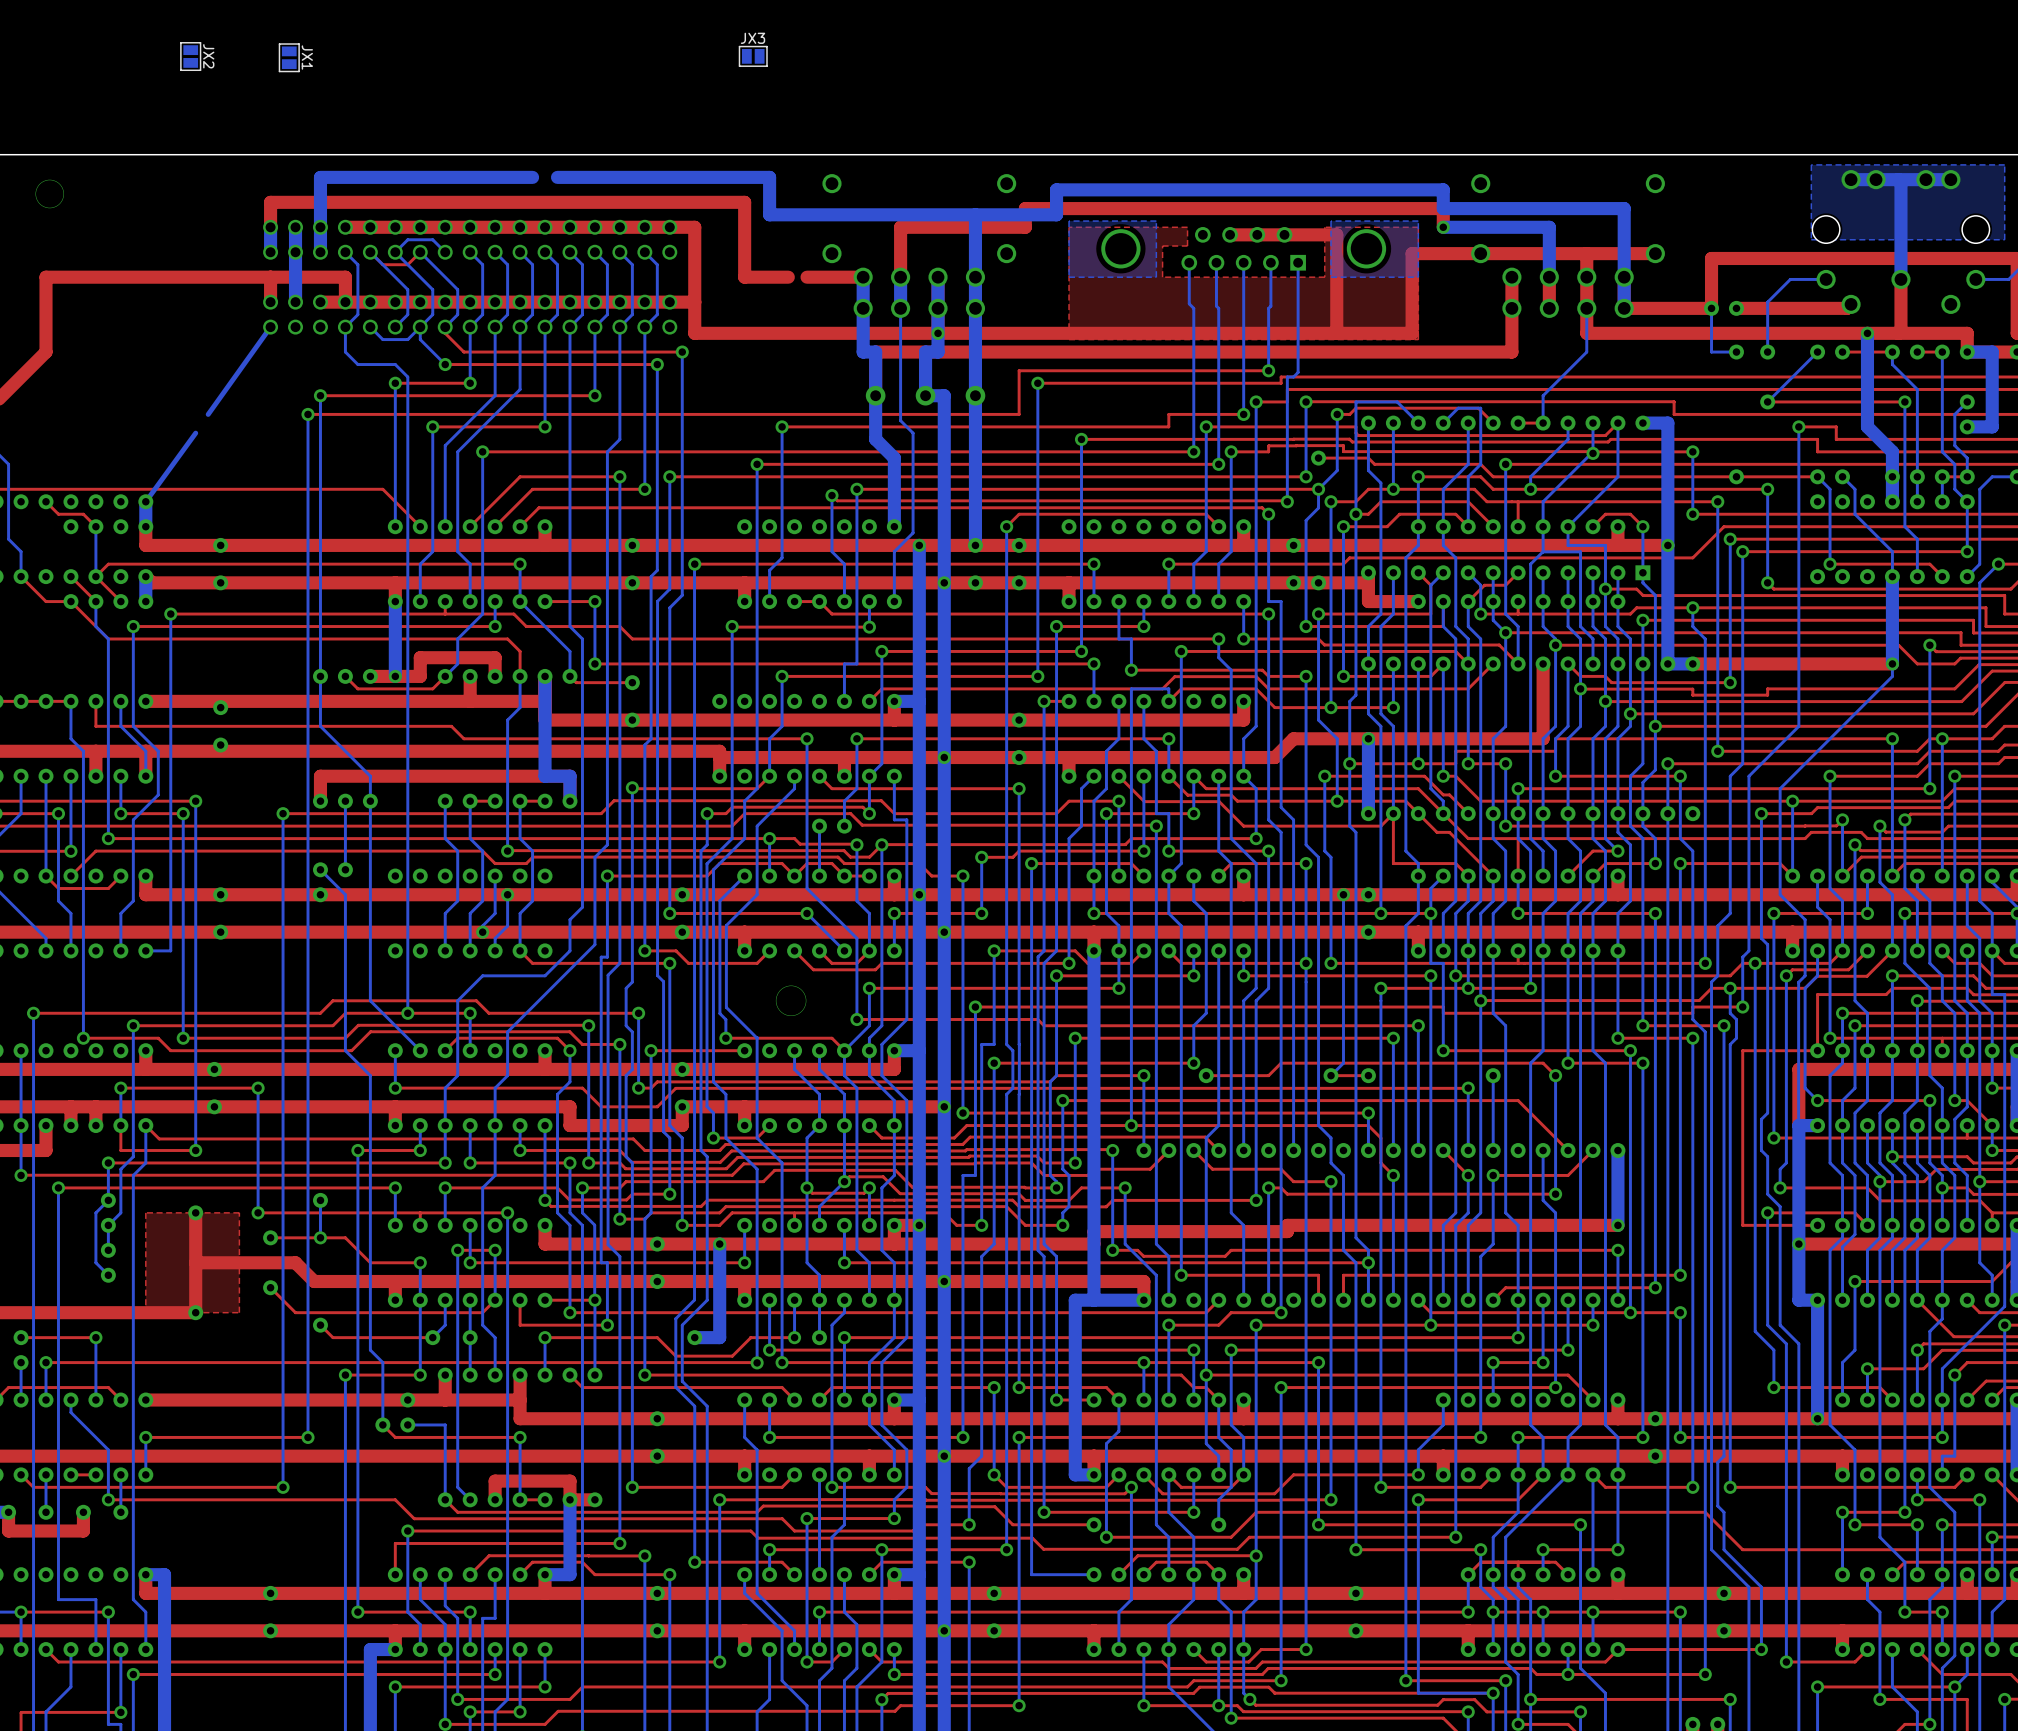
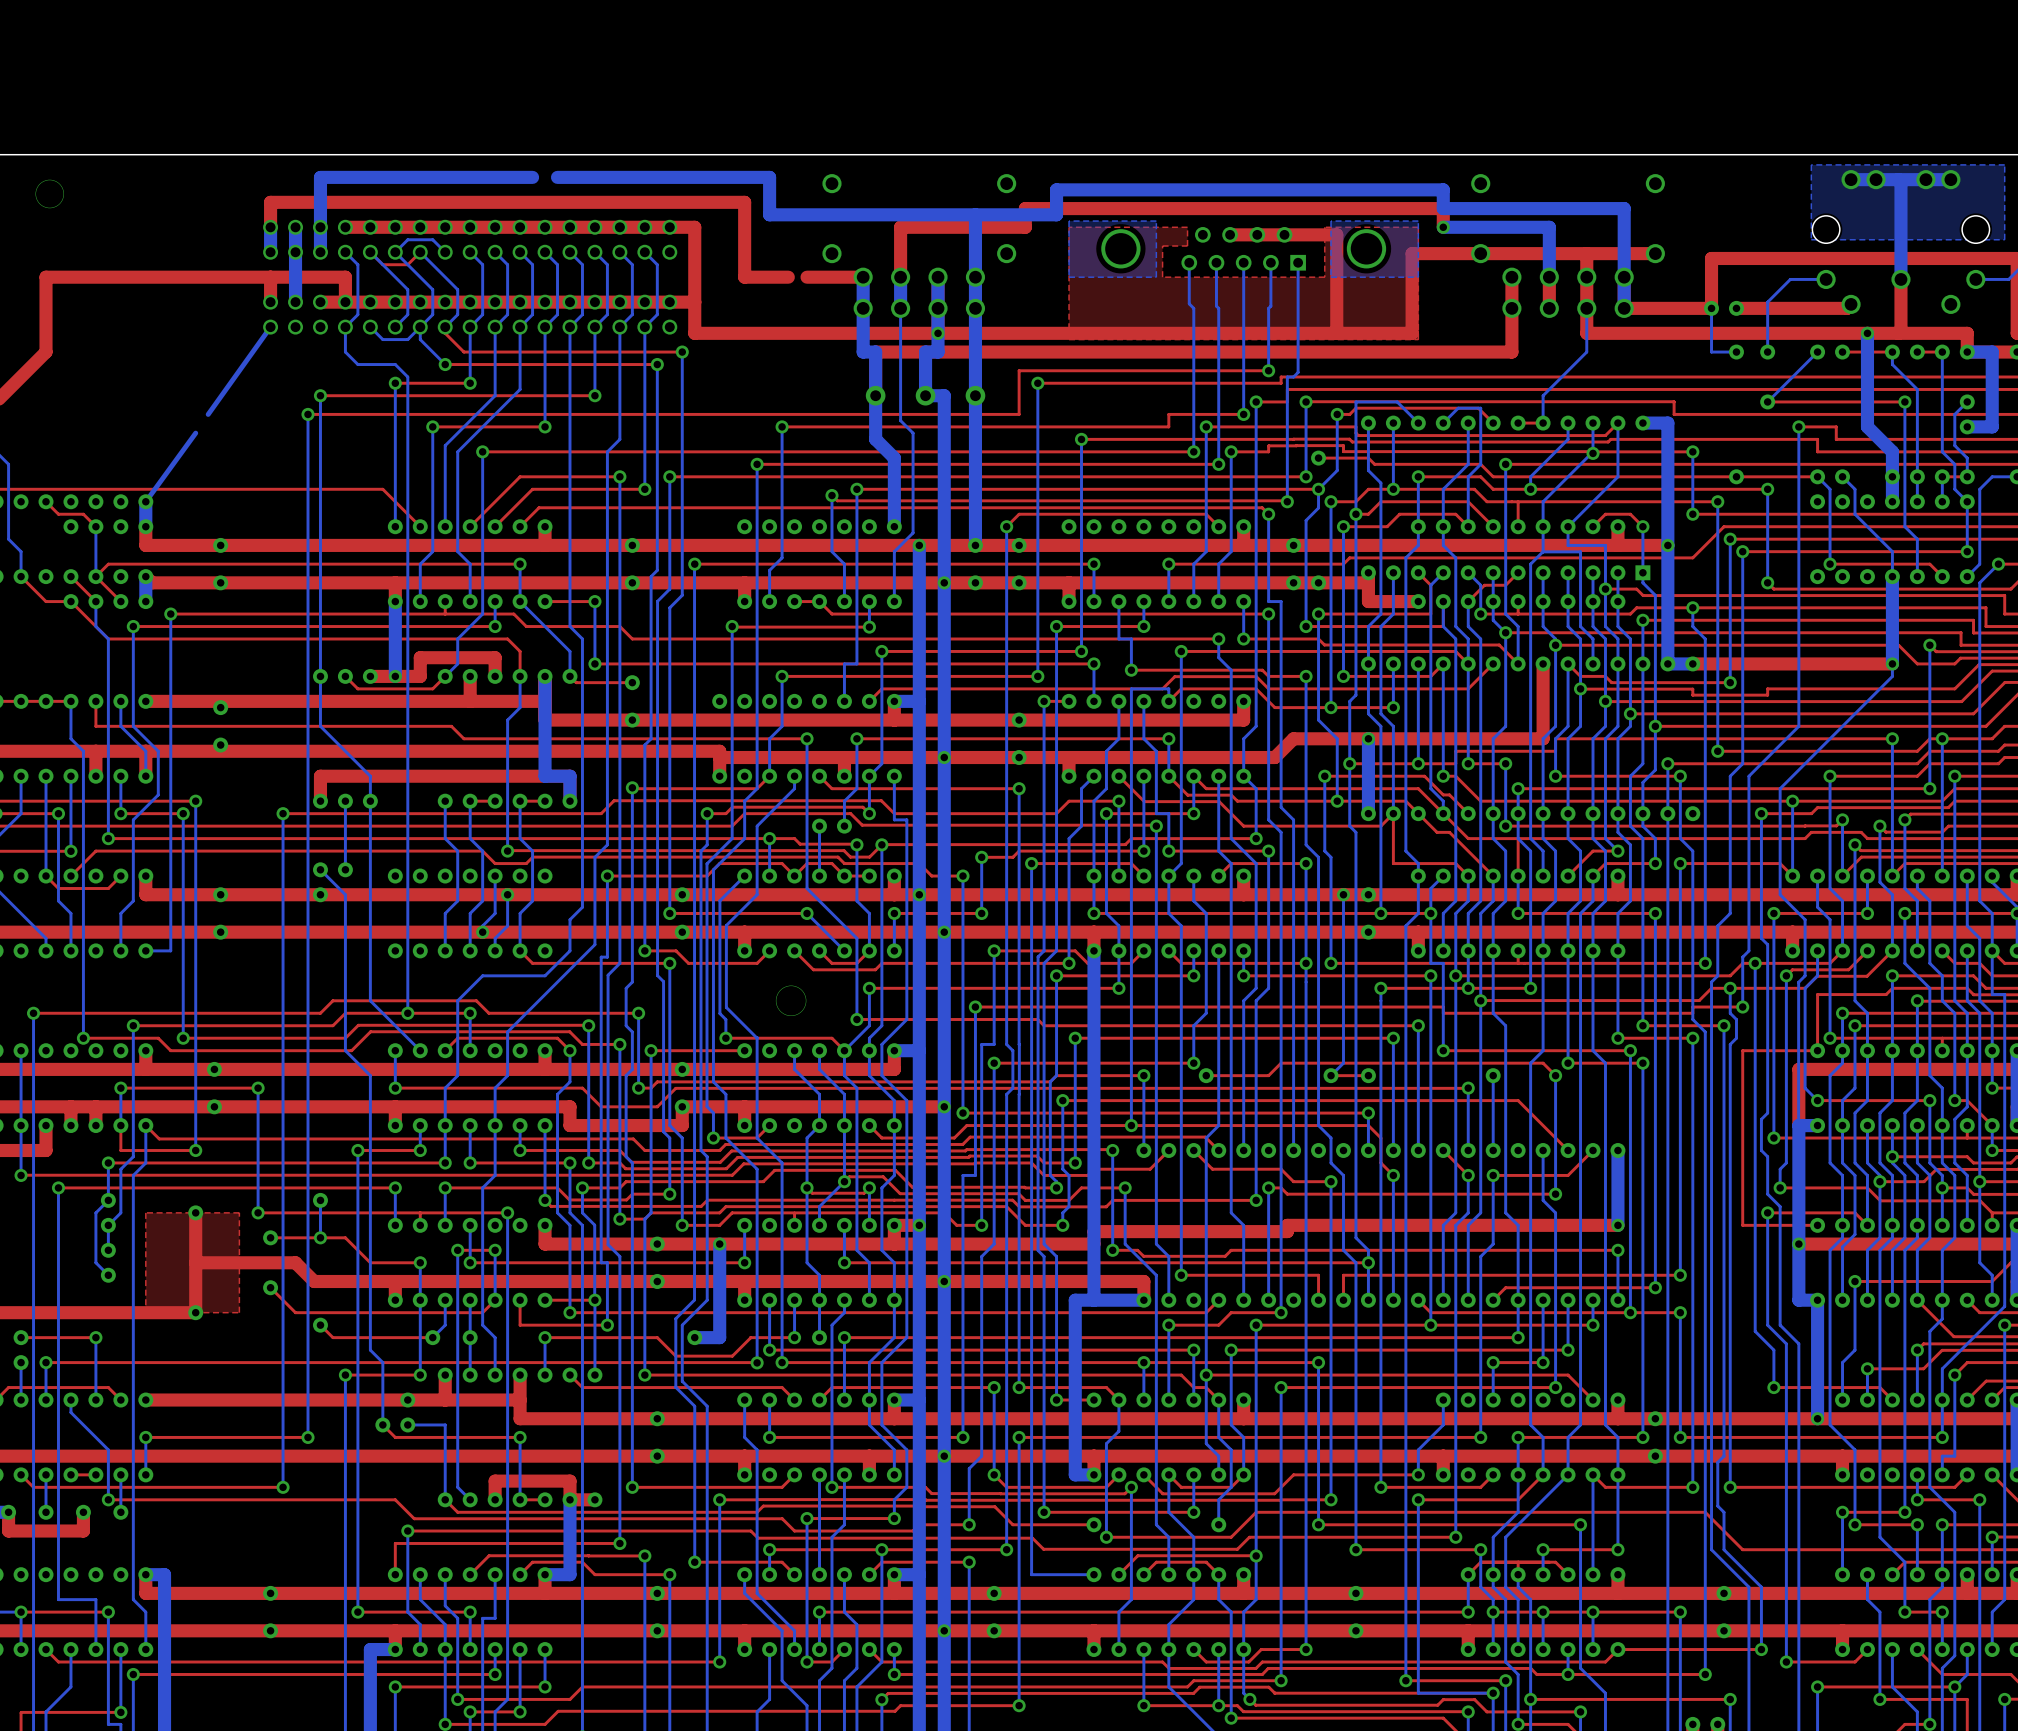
JX2: (190, 56) -> none
JX3: (753, 56) -> none
JX1: (289, 57) -> none

